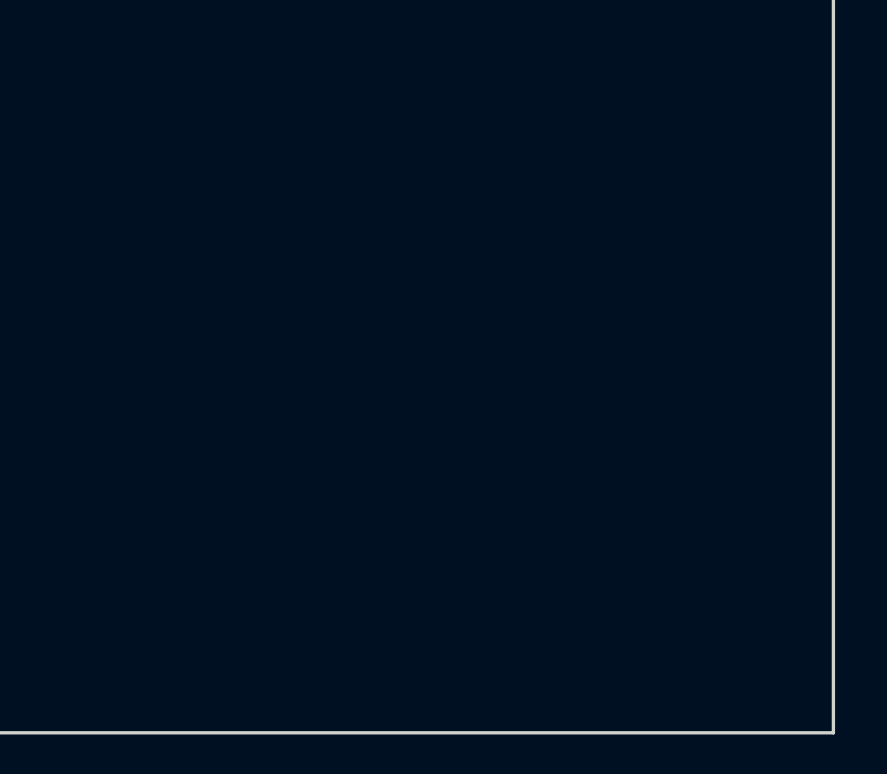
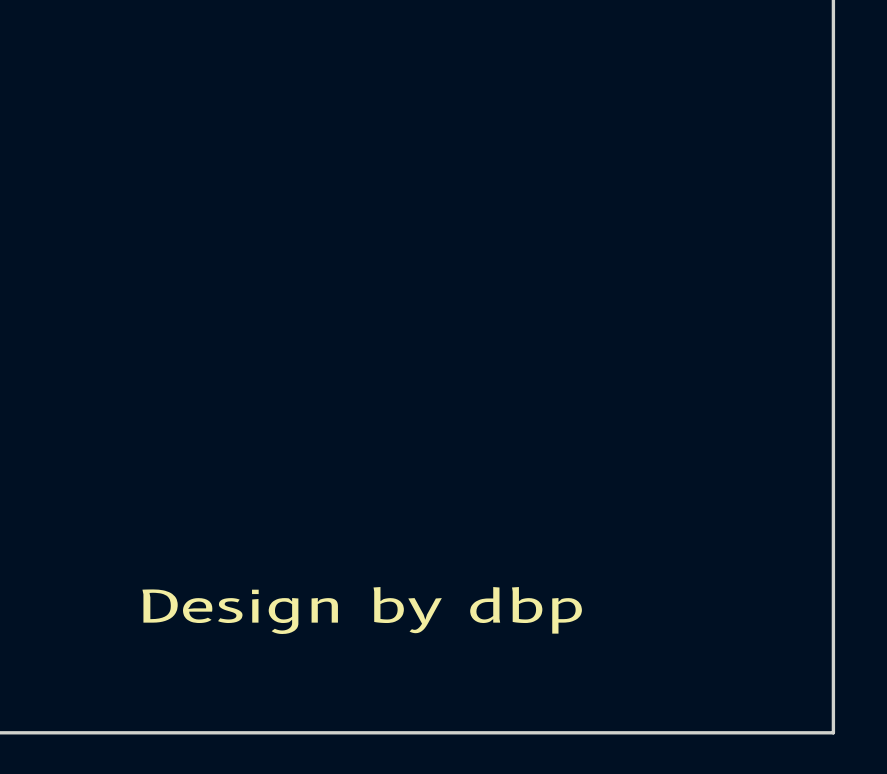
text: none -> Design by dbp (362, 610)

